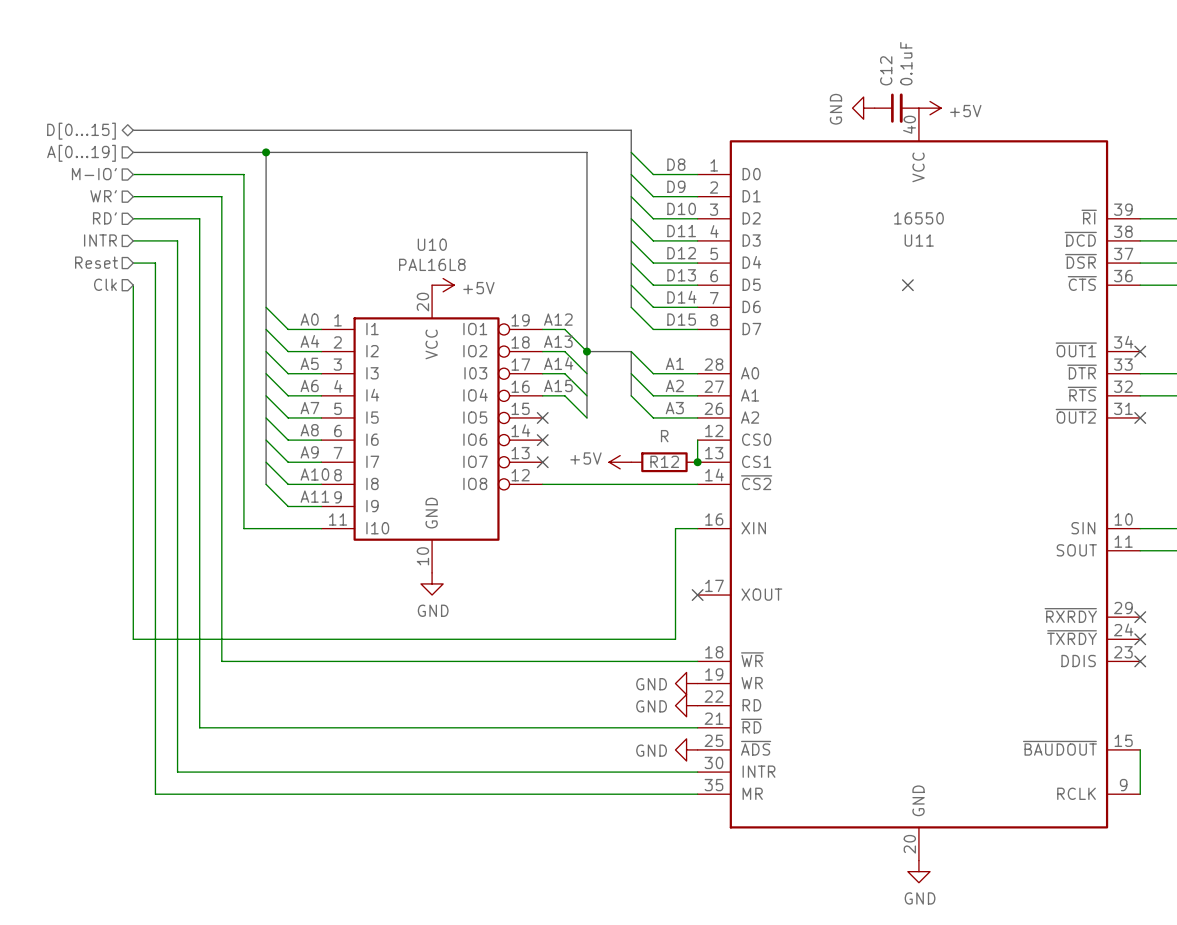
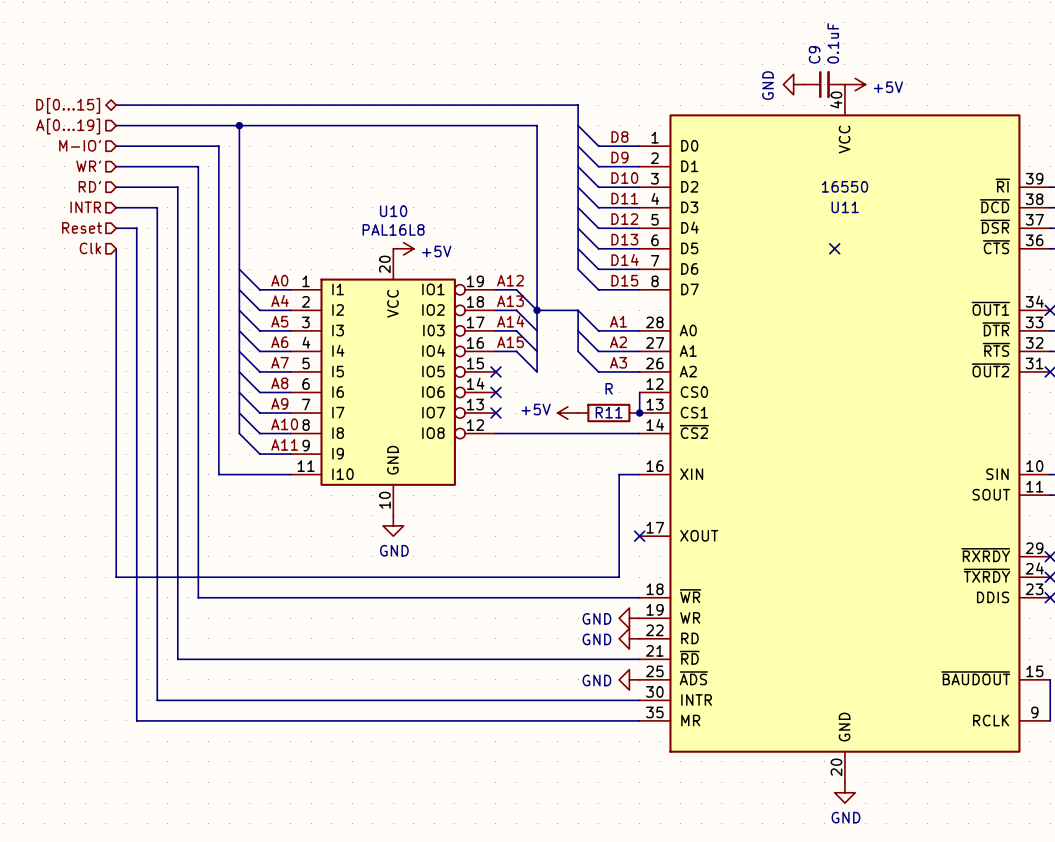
C12 name: C12 (886, 70) -> C9 (814, 54)
R12 name: R12 (664, 461) -> R11 (609, 412)

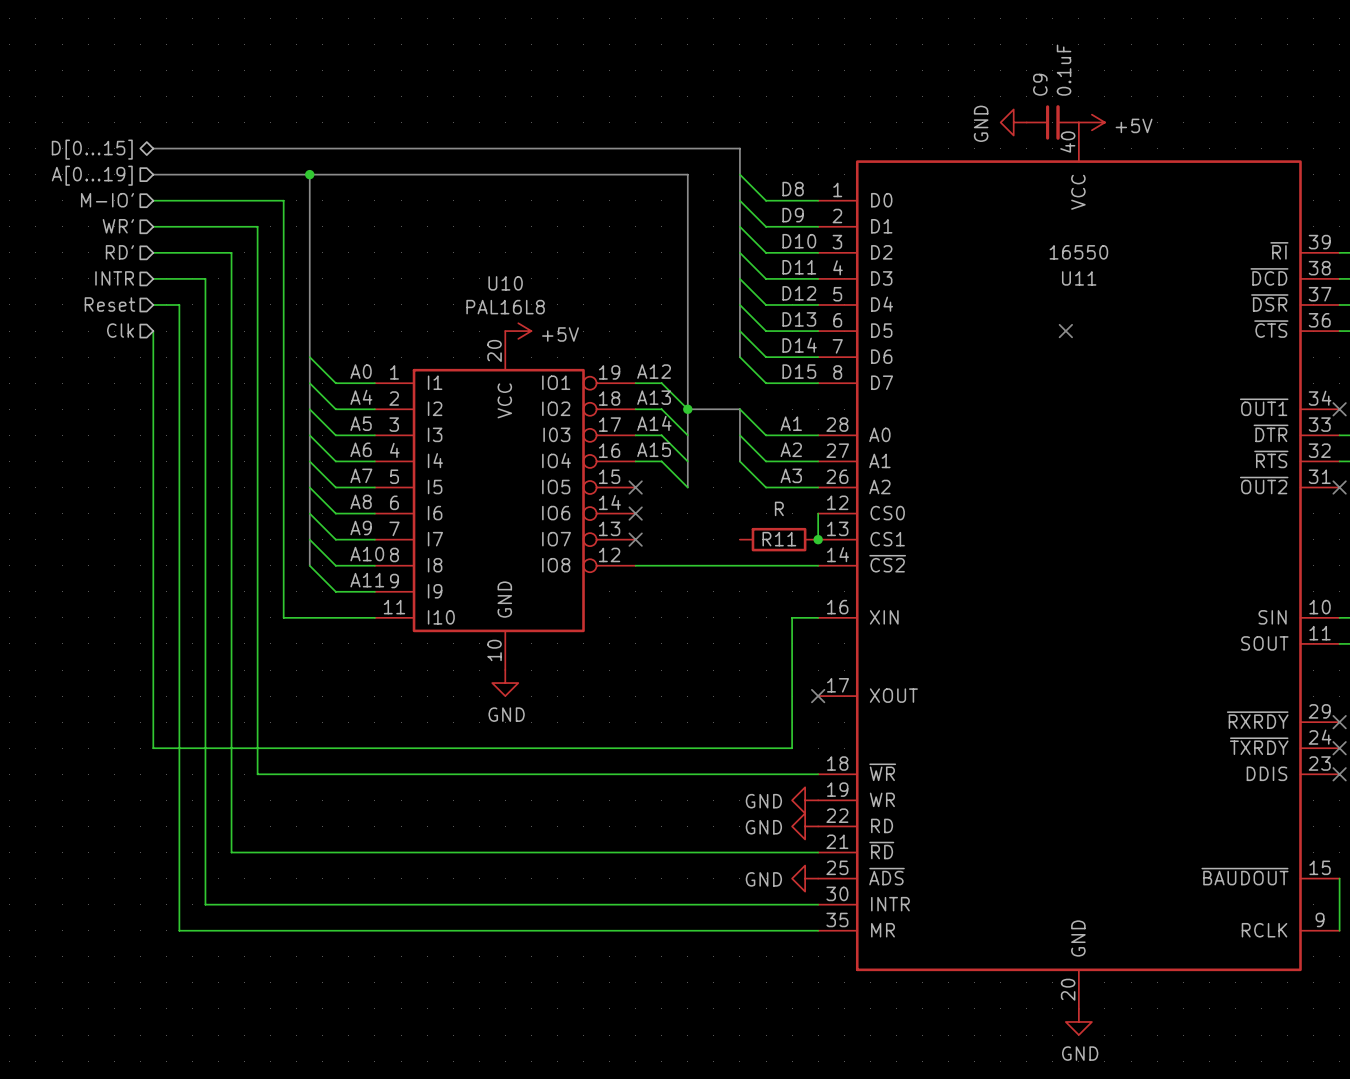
power symbol: +5V (567, 413) -> none

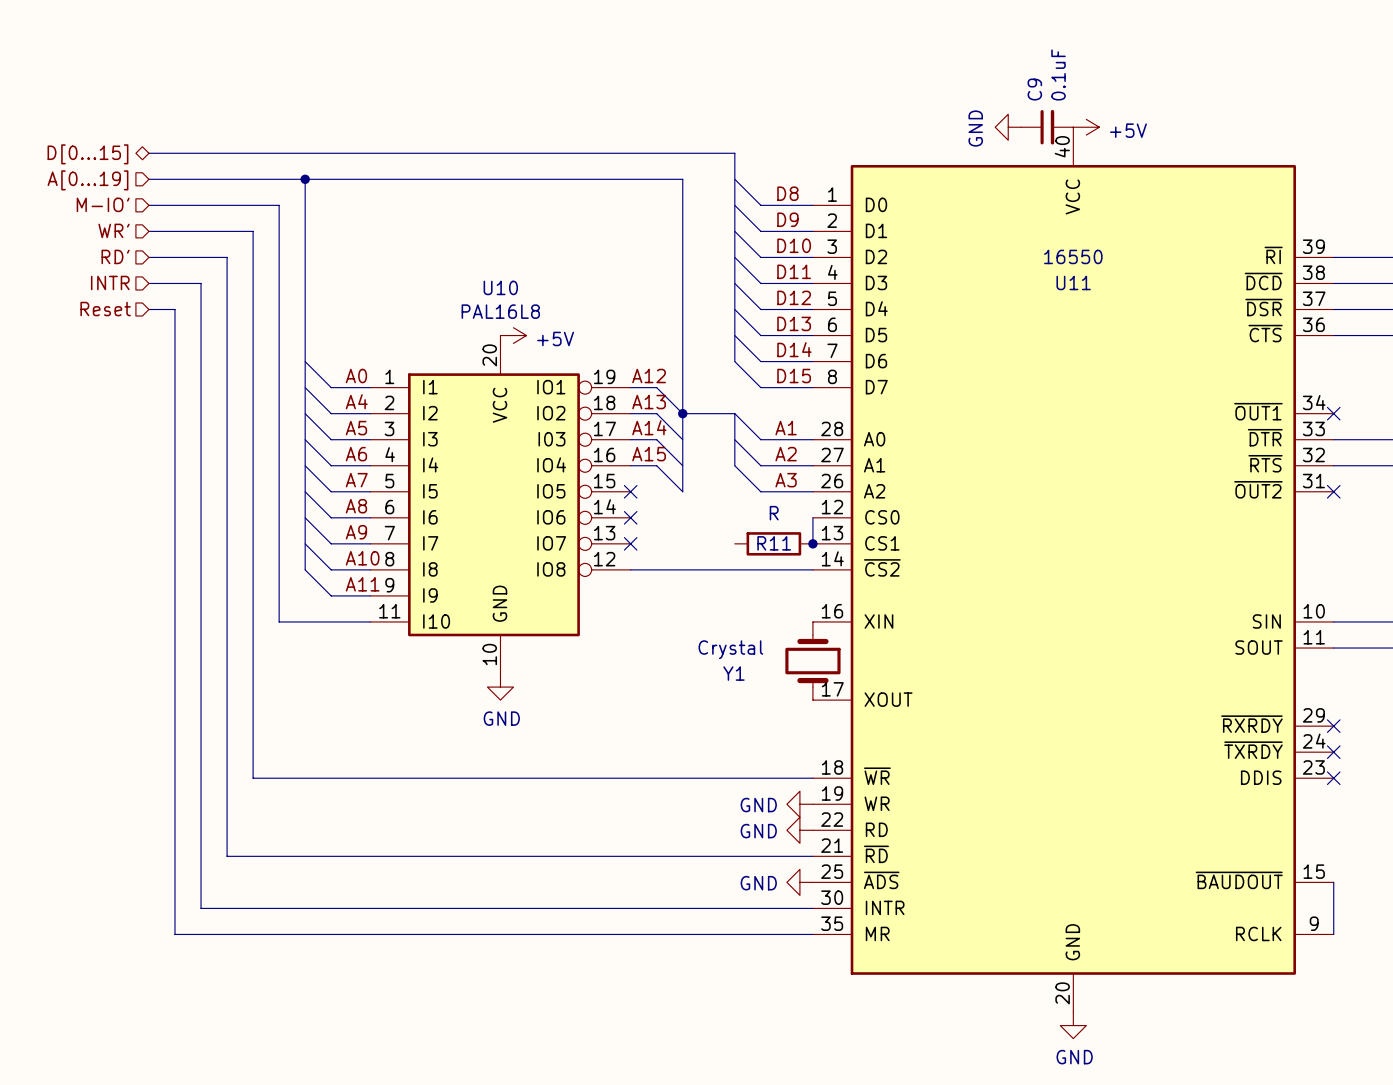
hierarchical label: Clk (120, 330) -> none
wire: (153, 331) (153, 748) (792, 748) (792, 617) (818, 617) -> none
no-connect mark: (1065, 331) -> none
Y1: none -> Crystal (812, 661)
no-connect mark: (818, 696) -> none

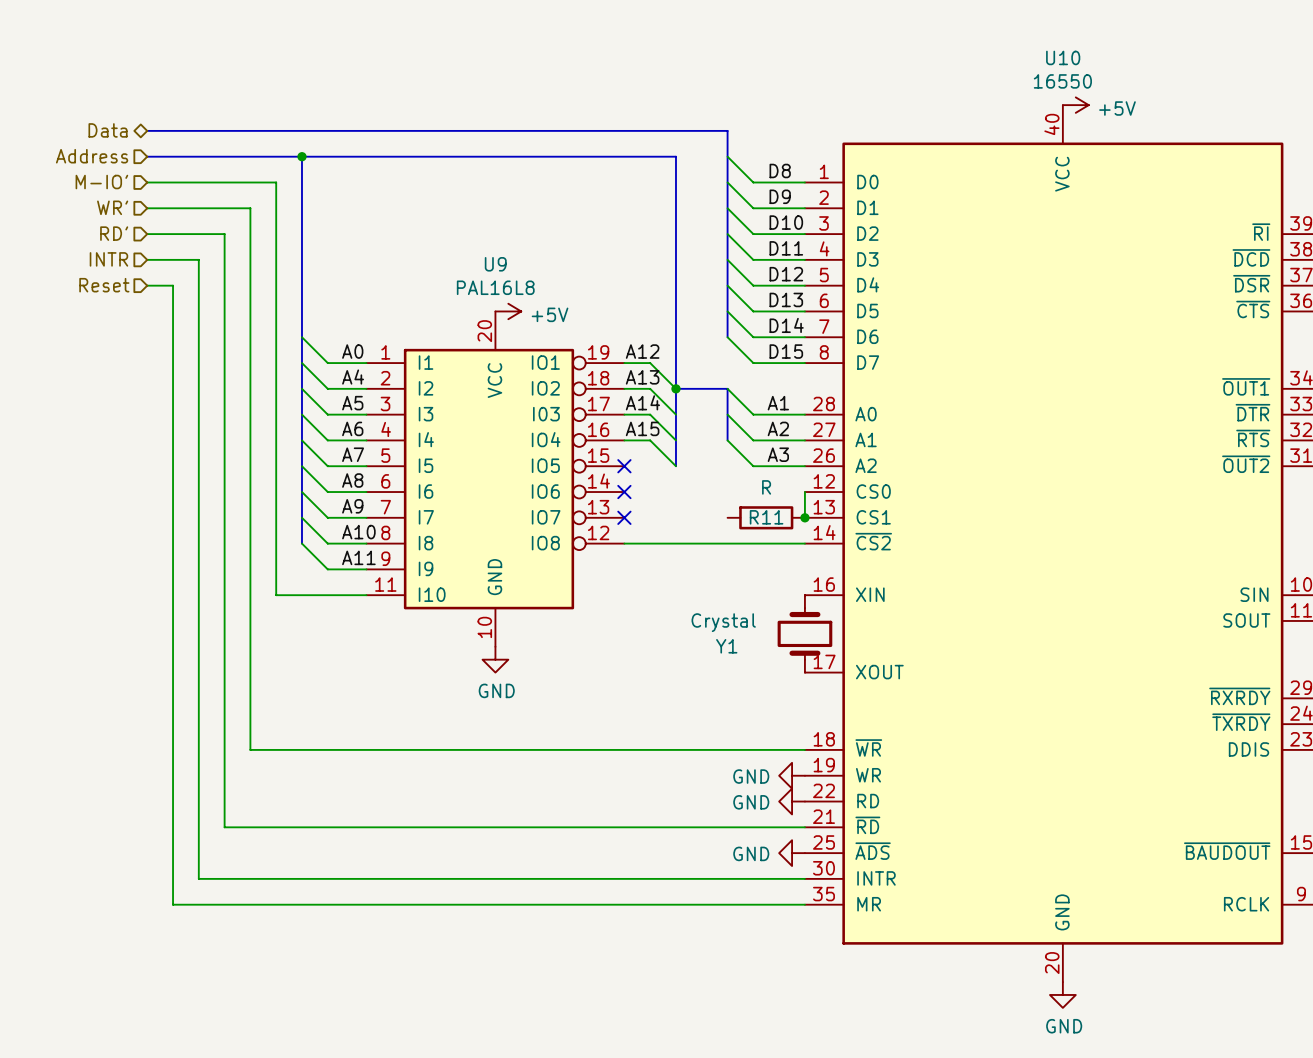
power symbol: GND (1008, 127) -> none
C9: 0.1uF (1047, 127) -> none
hierarchical label: D[0...15] (87, 154) -> Data (108, 130)
hierarchical label: A[0...19] (87, 180) -> Address (92, 156)
U11 value position: 16550 (1073, 256) -> 16550 (1062, 81)
U11 name: U11 (1073, 282) -> U10 (1063, 57)
U10 name: U10 (500, 287) -> U9 (495, 264)

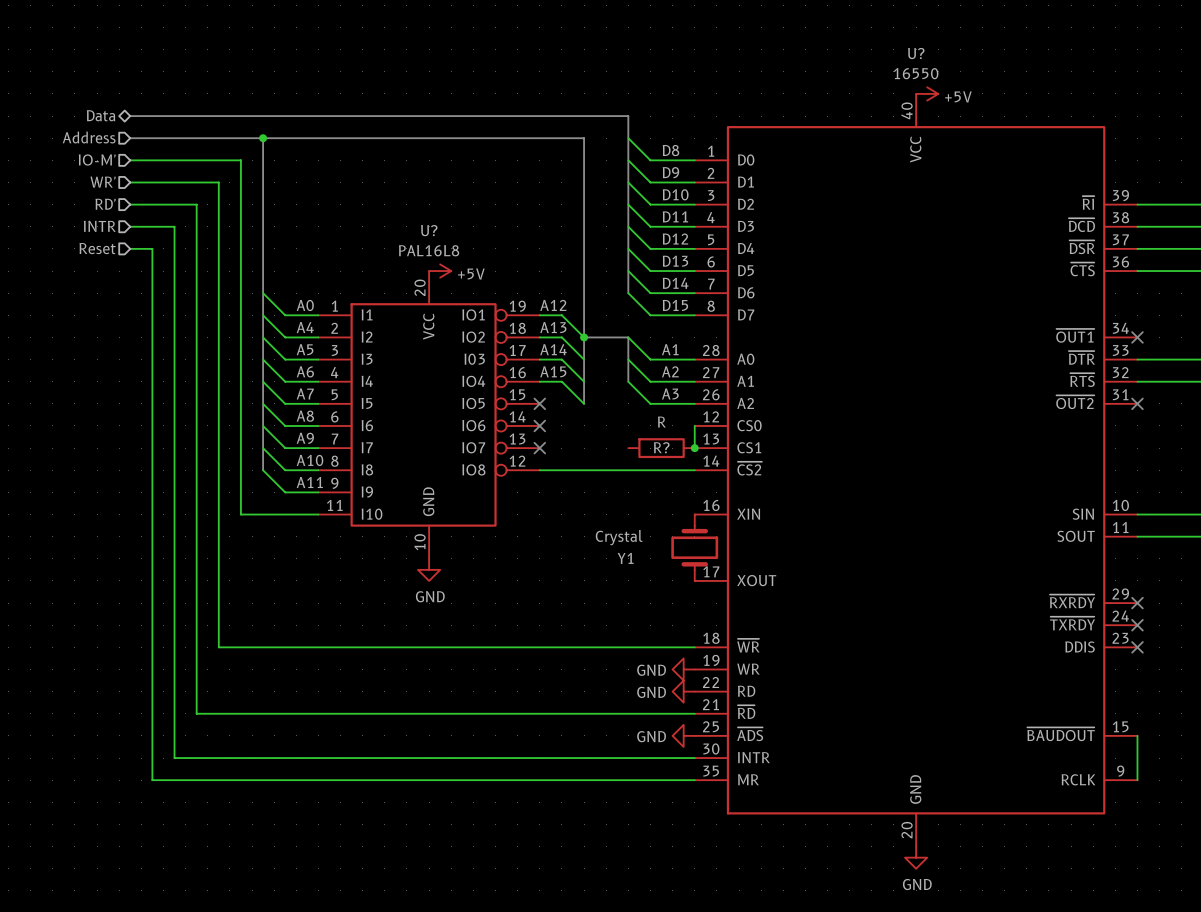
U10 name: U10 (1063, 57) -> U? (916, 53)
hierarchical label: M-IO' (101, 182) -> IO-M' (97, 159)
U9 name: U9 (495, 264) -> U? (429, 230)
R11 name: R11 (766, 517) -> R? (661, 447)

